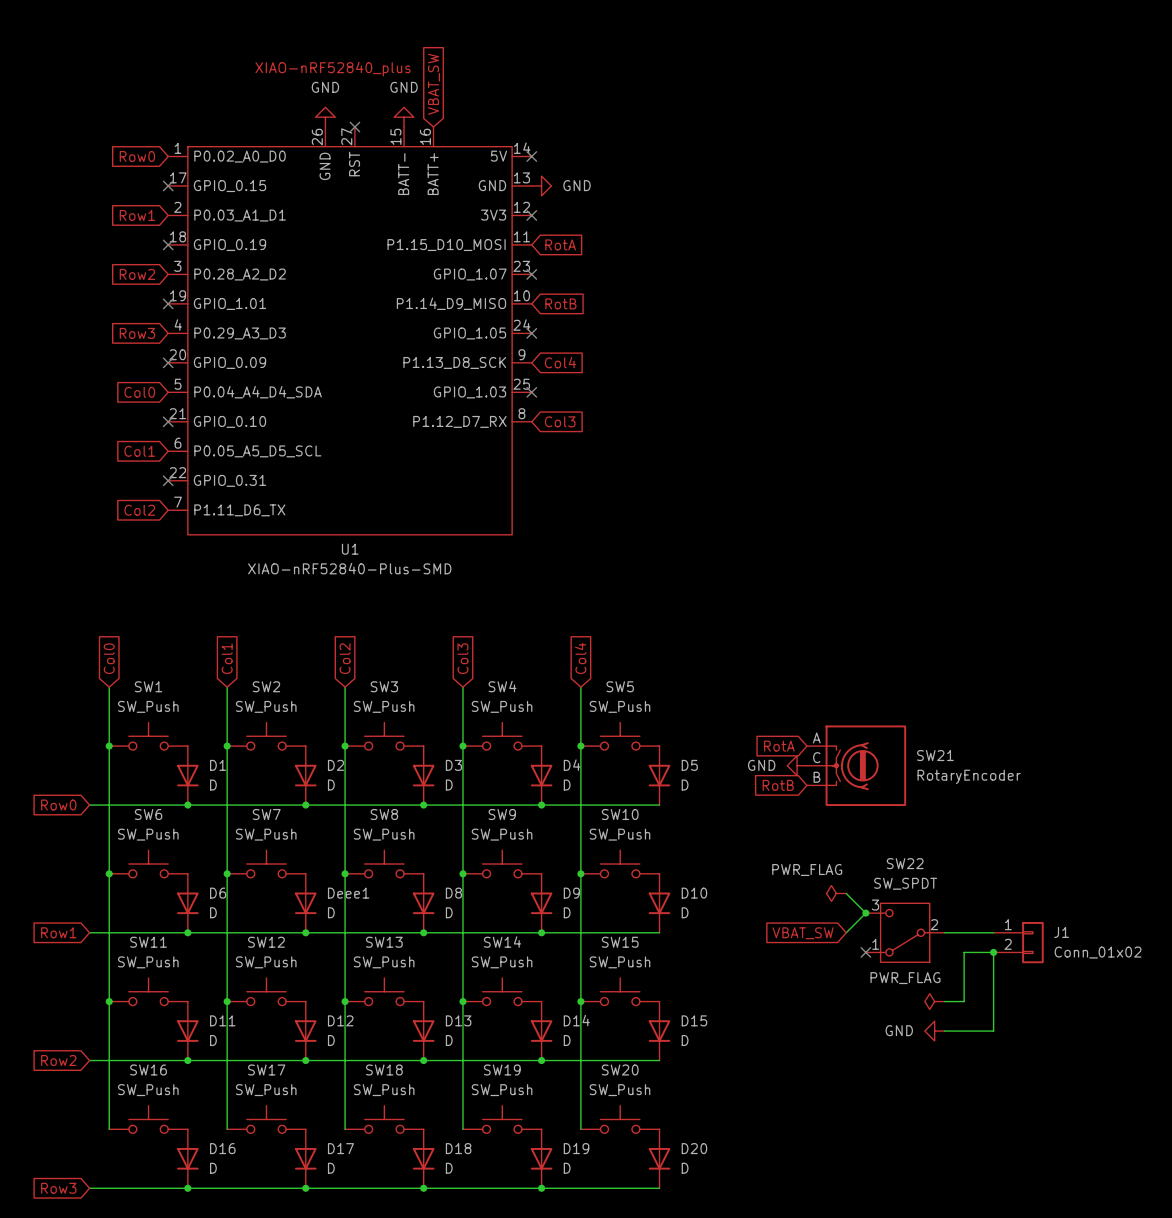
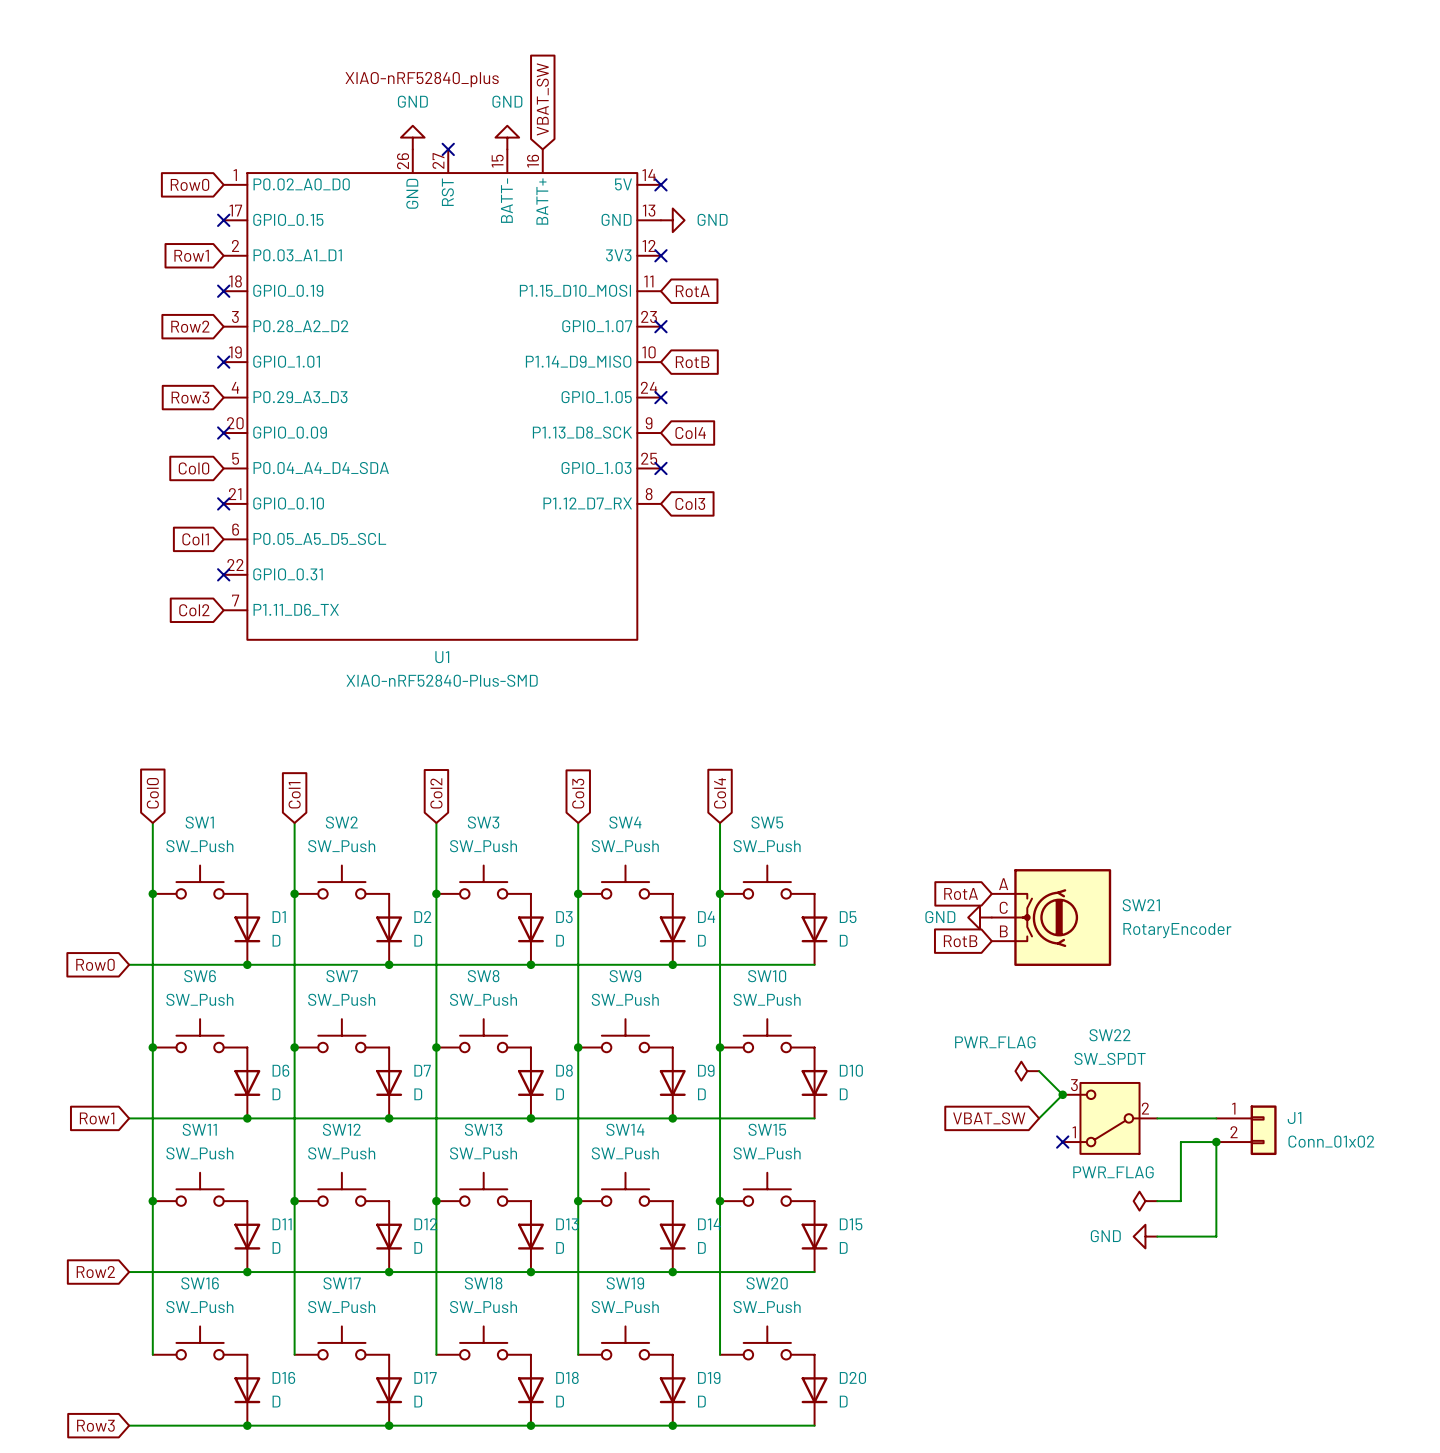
Deee1 name: Deee1 (348, 893) -> D7 (422, 1070)

